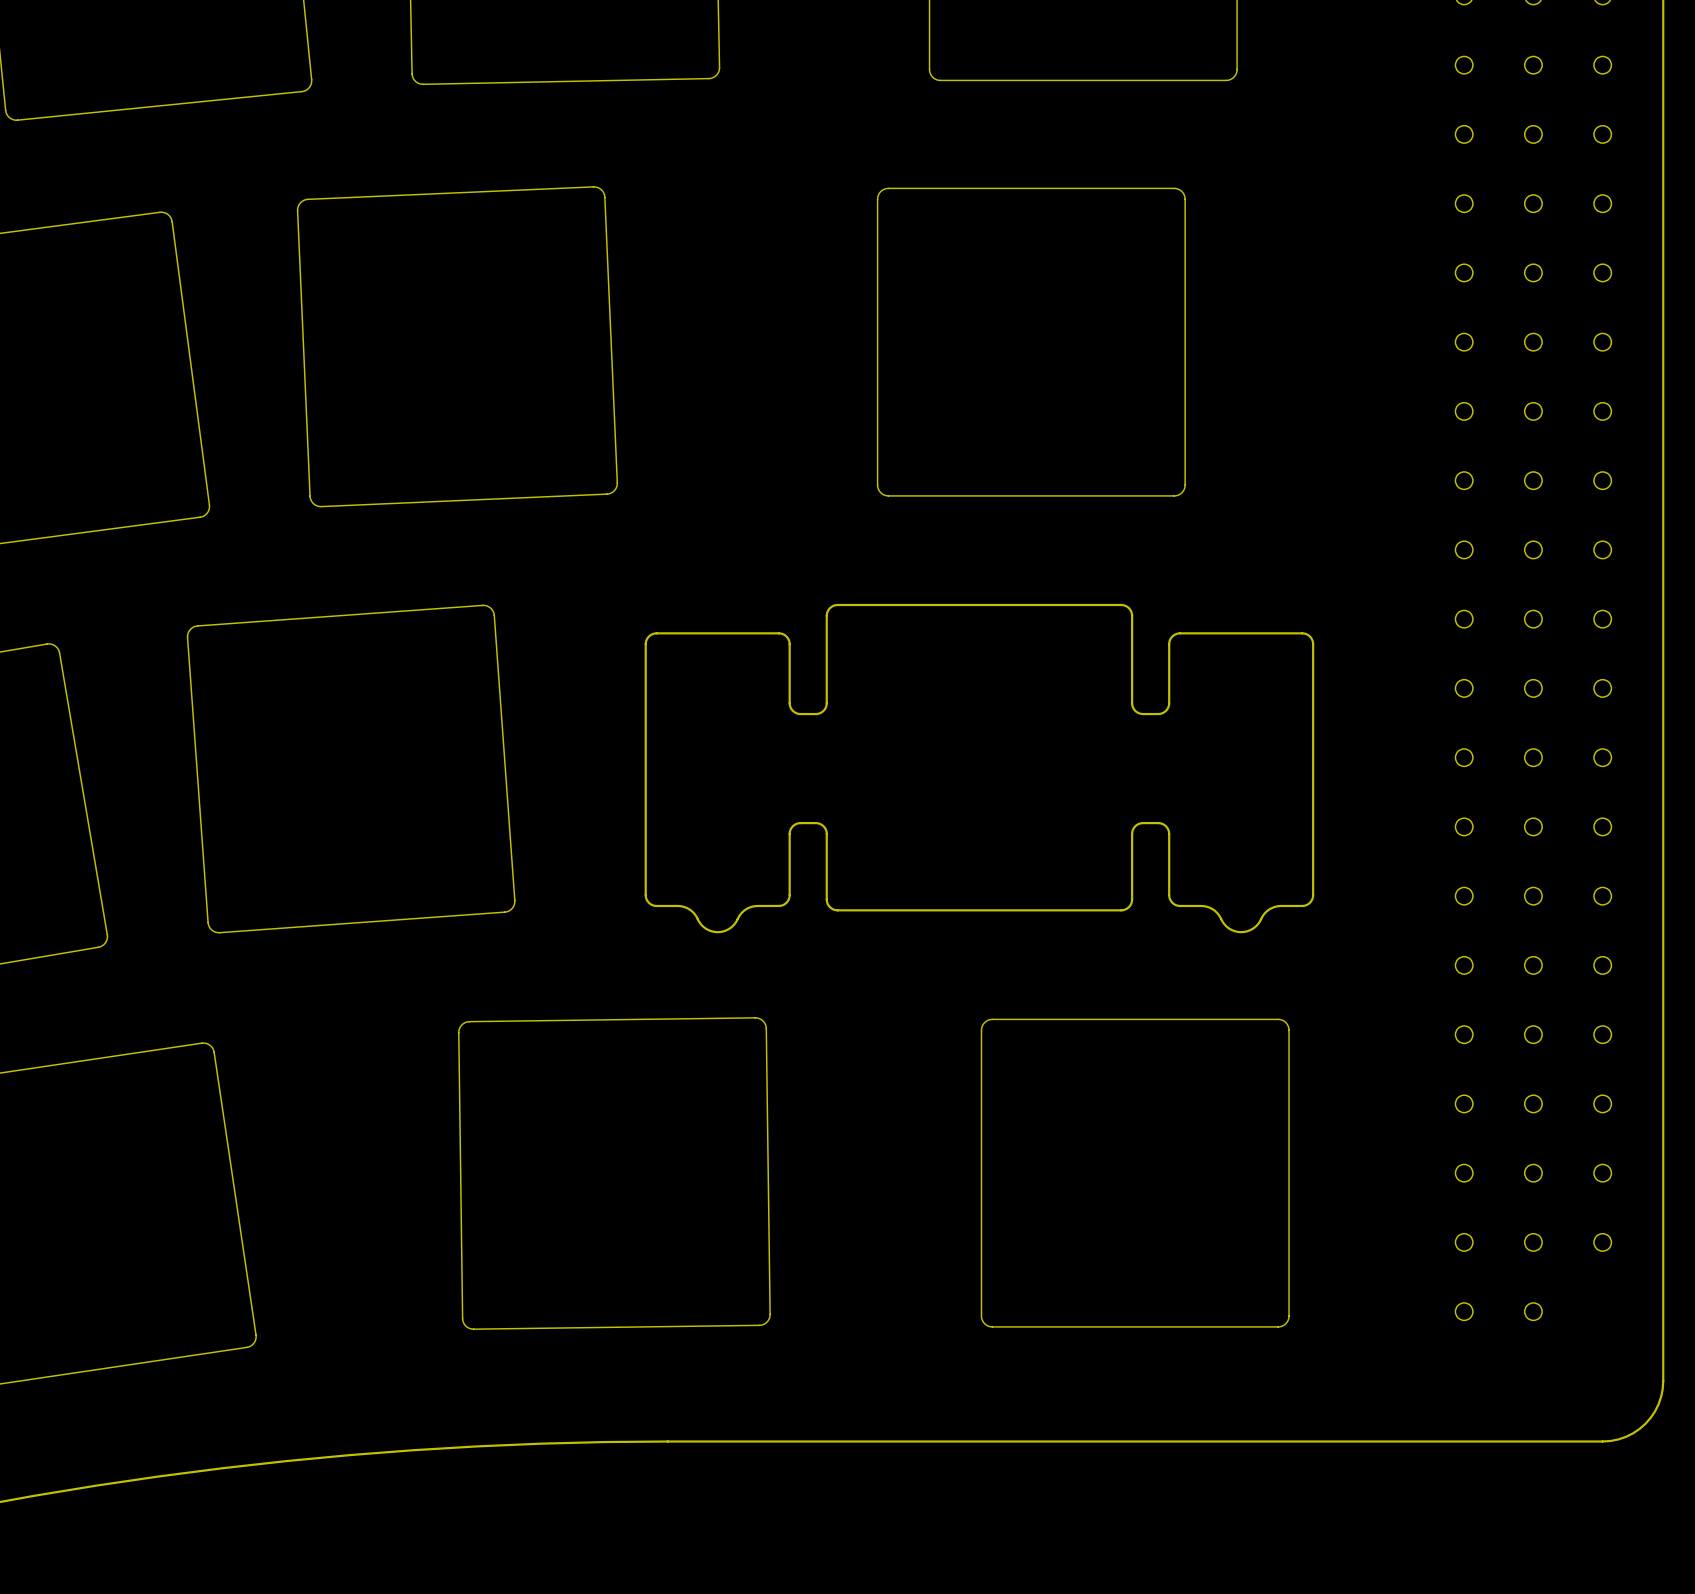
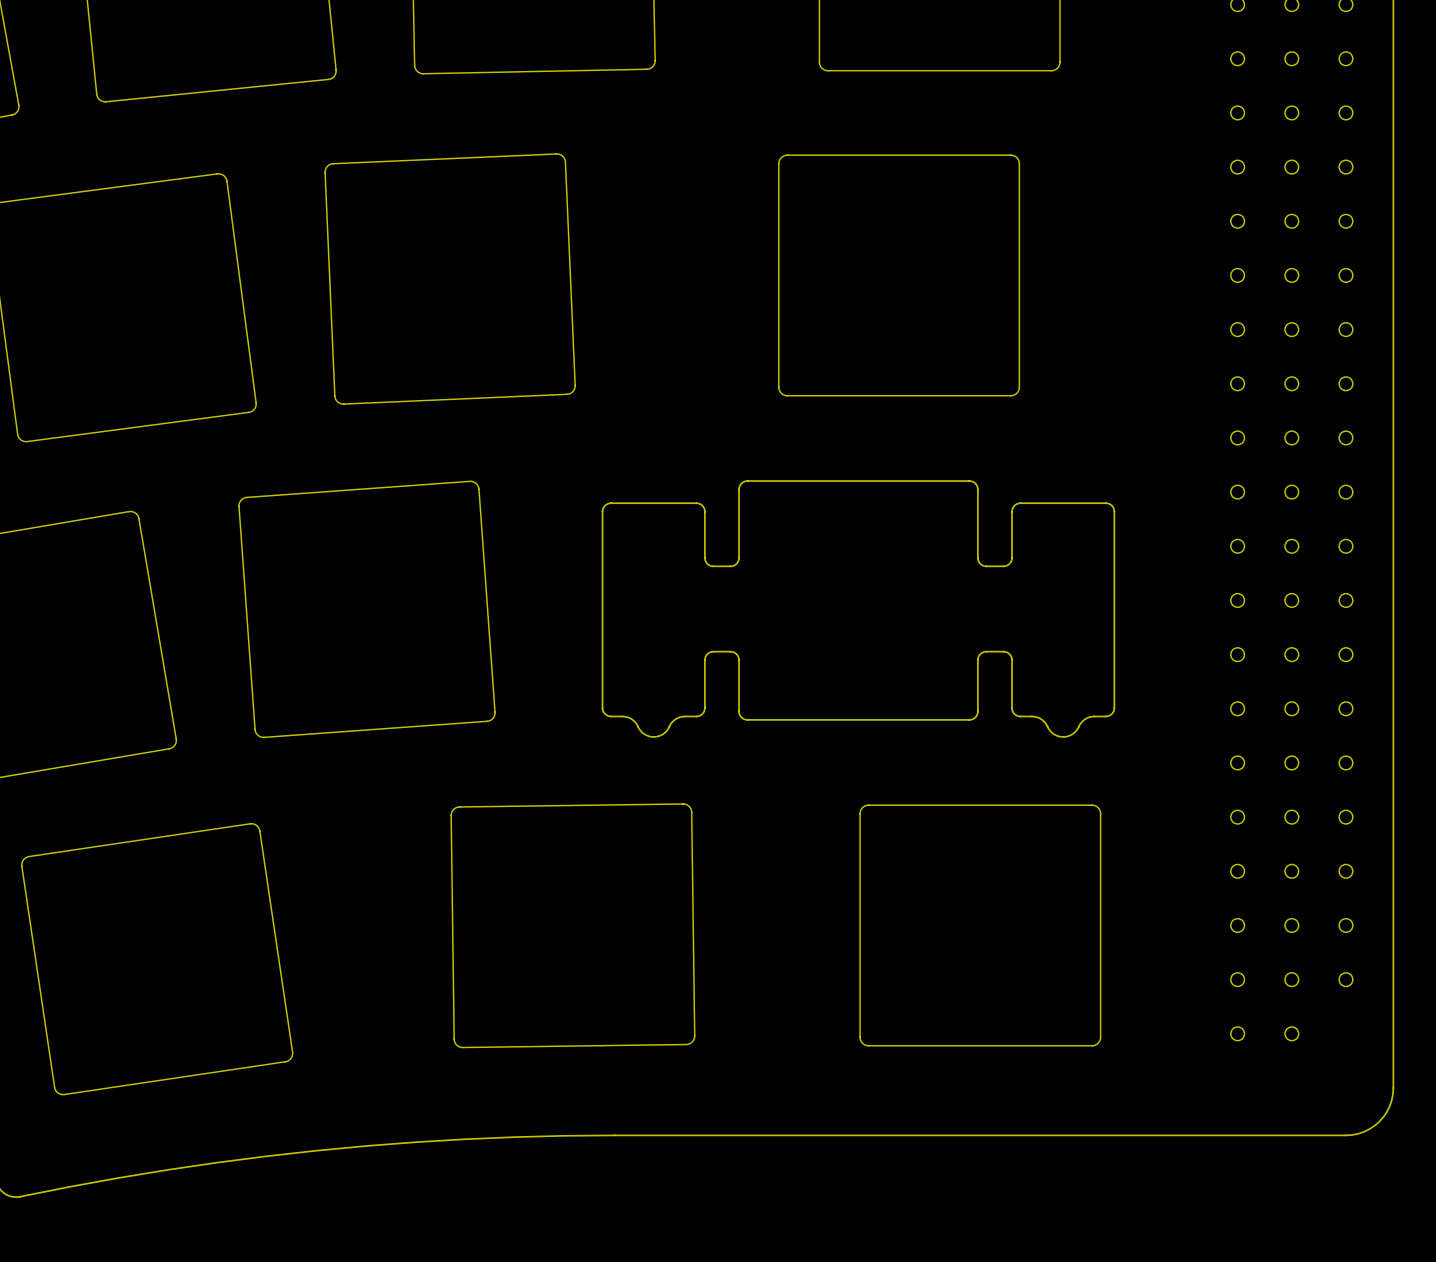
drawing shape: [644, 603, 1315, 934] -> [601, 480, 1116, 738]

